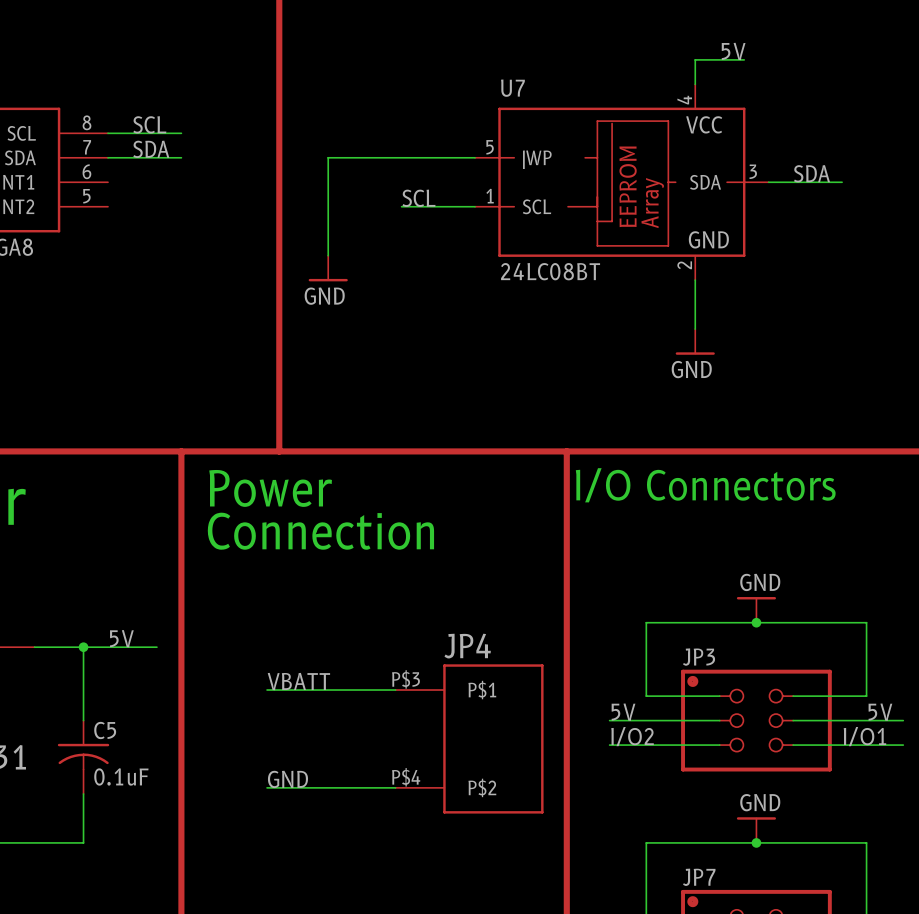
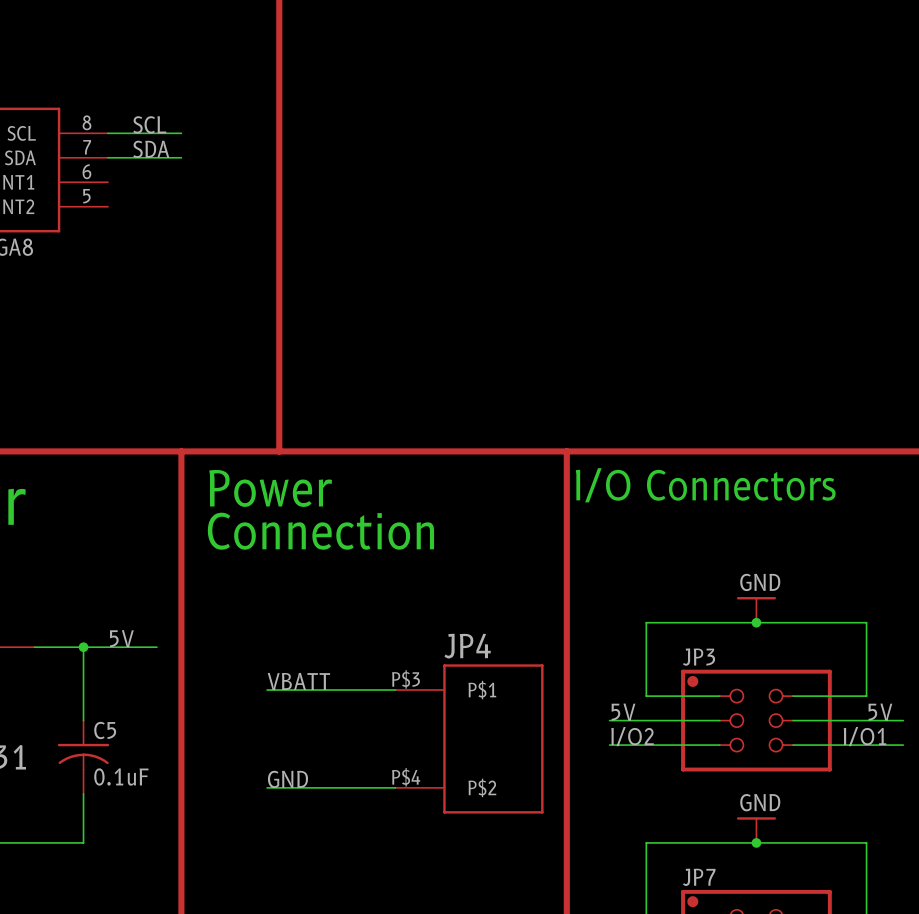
label: 5V (733, 51) -> none
wire: (744, 59) (695, 59) (695, 84) -> none
wire: (475, 157) (328, 157) (328, 255) -> none
label: SDA (811, 173) -> none
U7: 24LC08BT (621, 182) -> none
wire: (768, 182) (842, 182) -> none
label: SCL (418, 198) -> none
wire: (401, 206) (475, 206) -> none
power symbol: GND (328, 268) -> none
wire: (695, 280) (695, 329) -> none
power symbol: GND (695, 341) -> none

